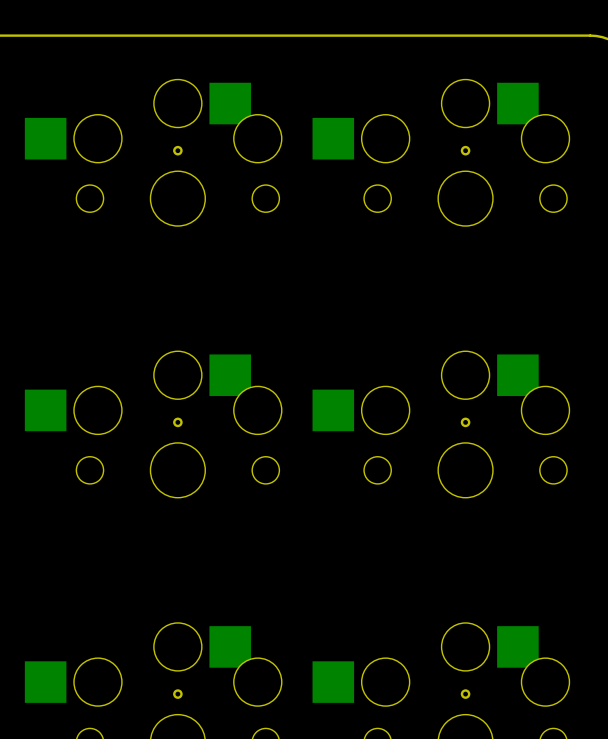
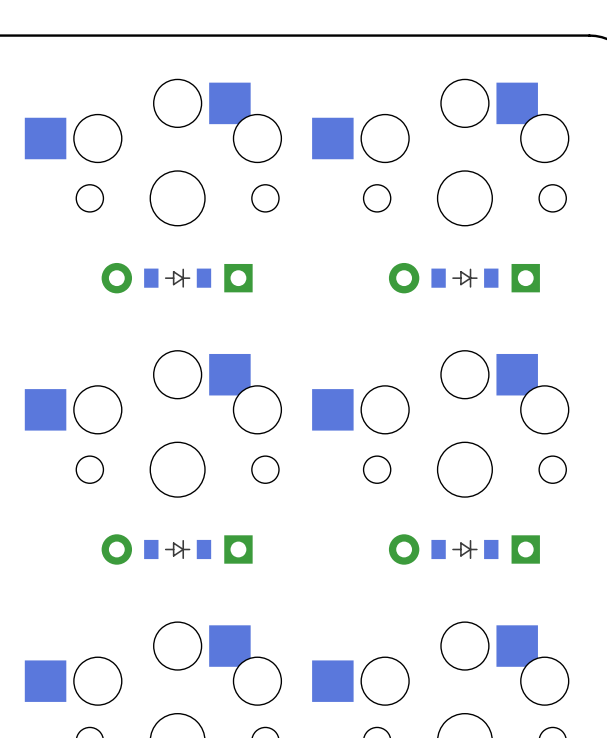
part: (177, 150) -> none
part: (465, 150) -> none
part: none -> (177, 278)
part: none -> (464, 278)
part: (177, 422) -> none
part: (465, 422) -> none
part: none -> (177, 549)
part: none -> (464, 549)
part: (177, 694) -> none
part: (465, 694) -> none

